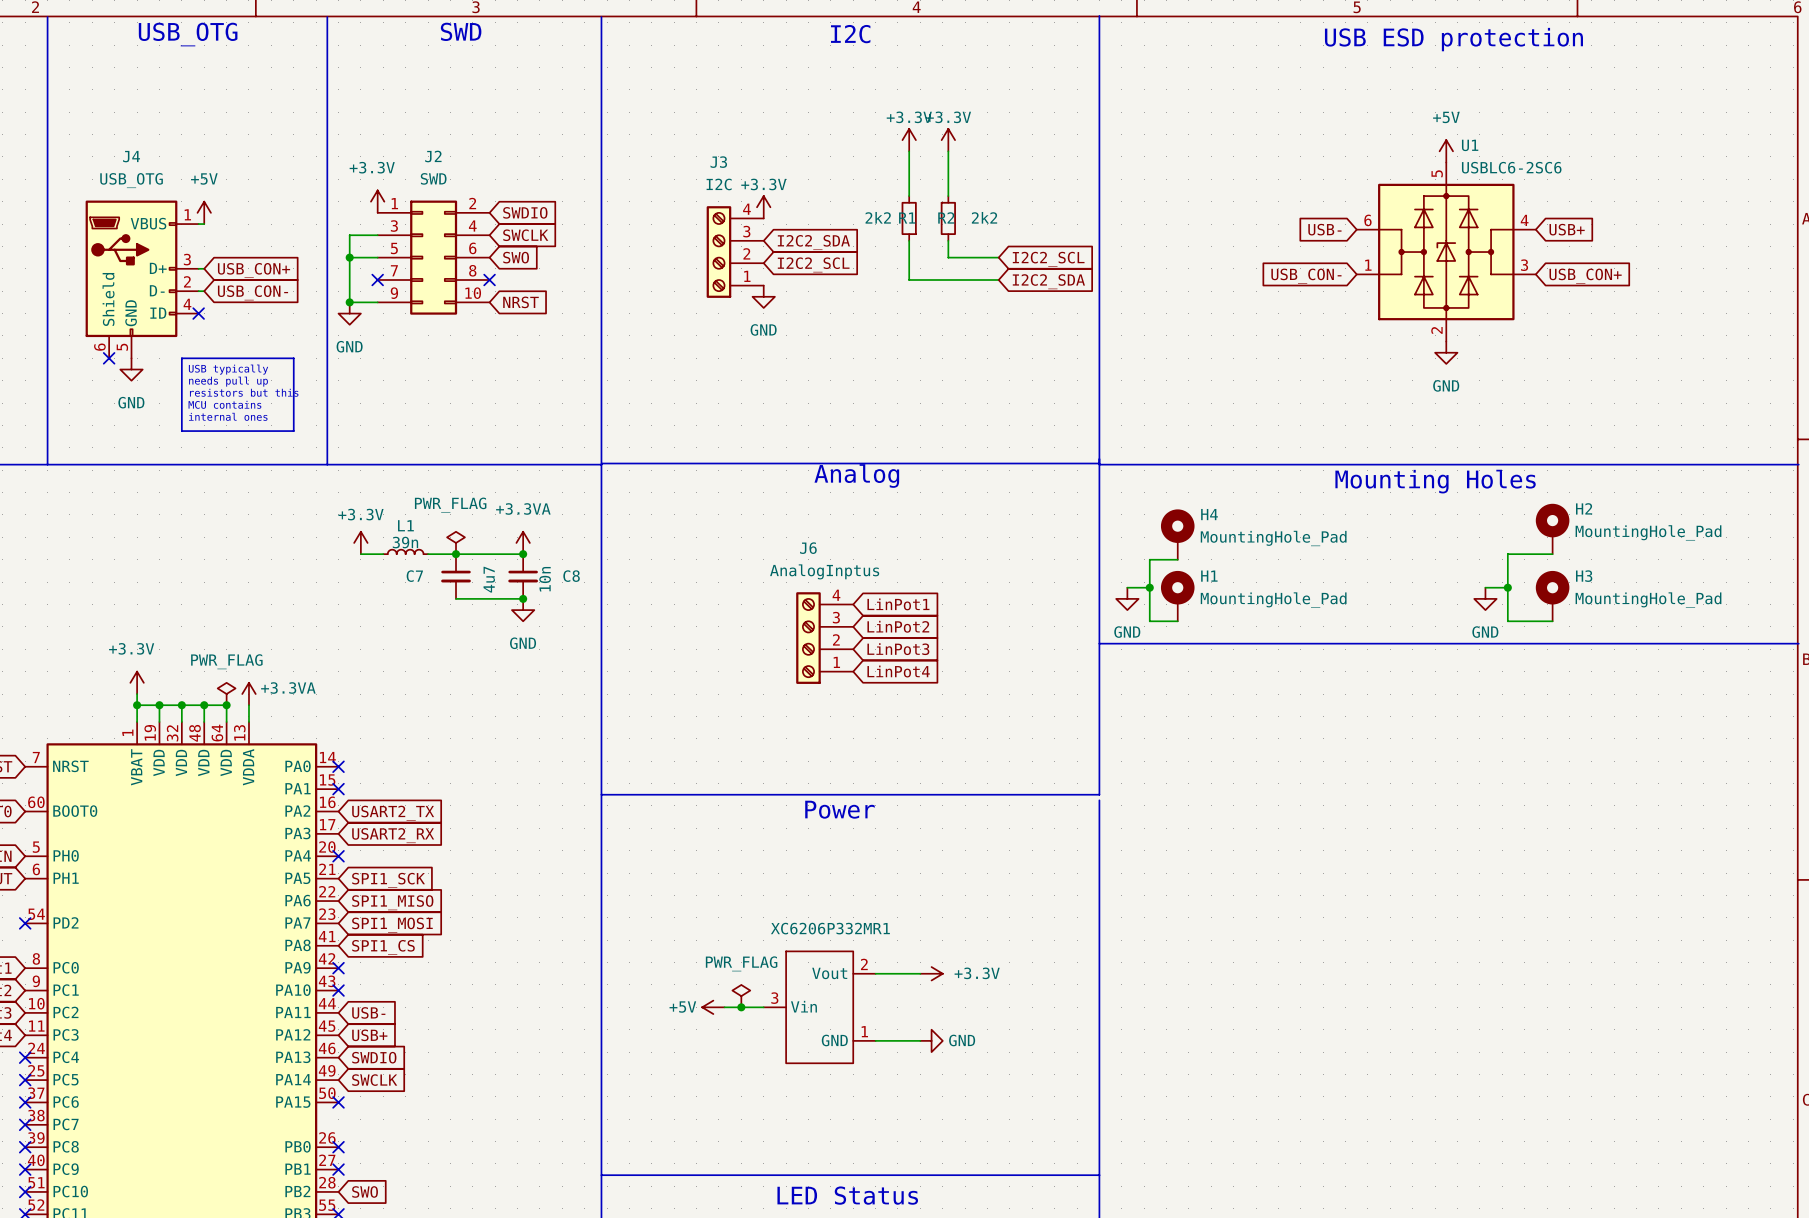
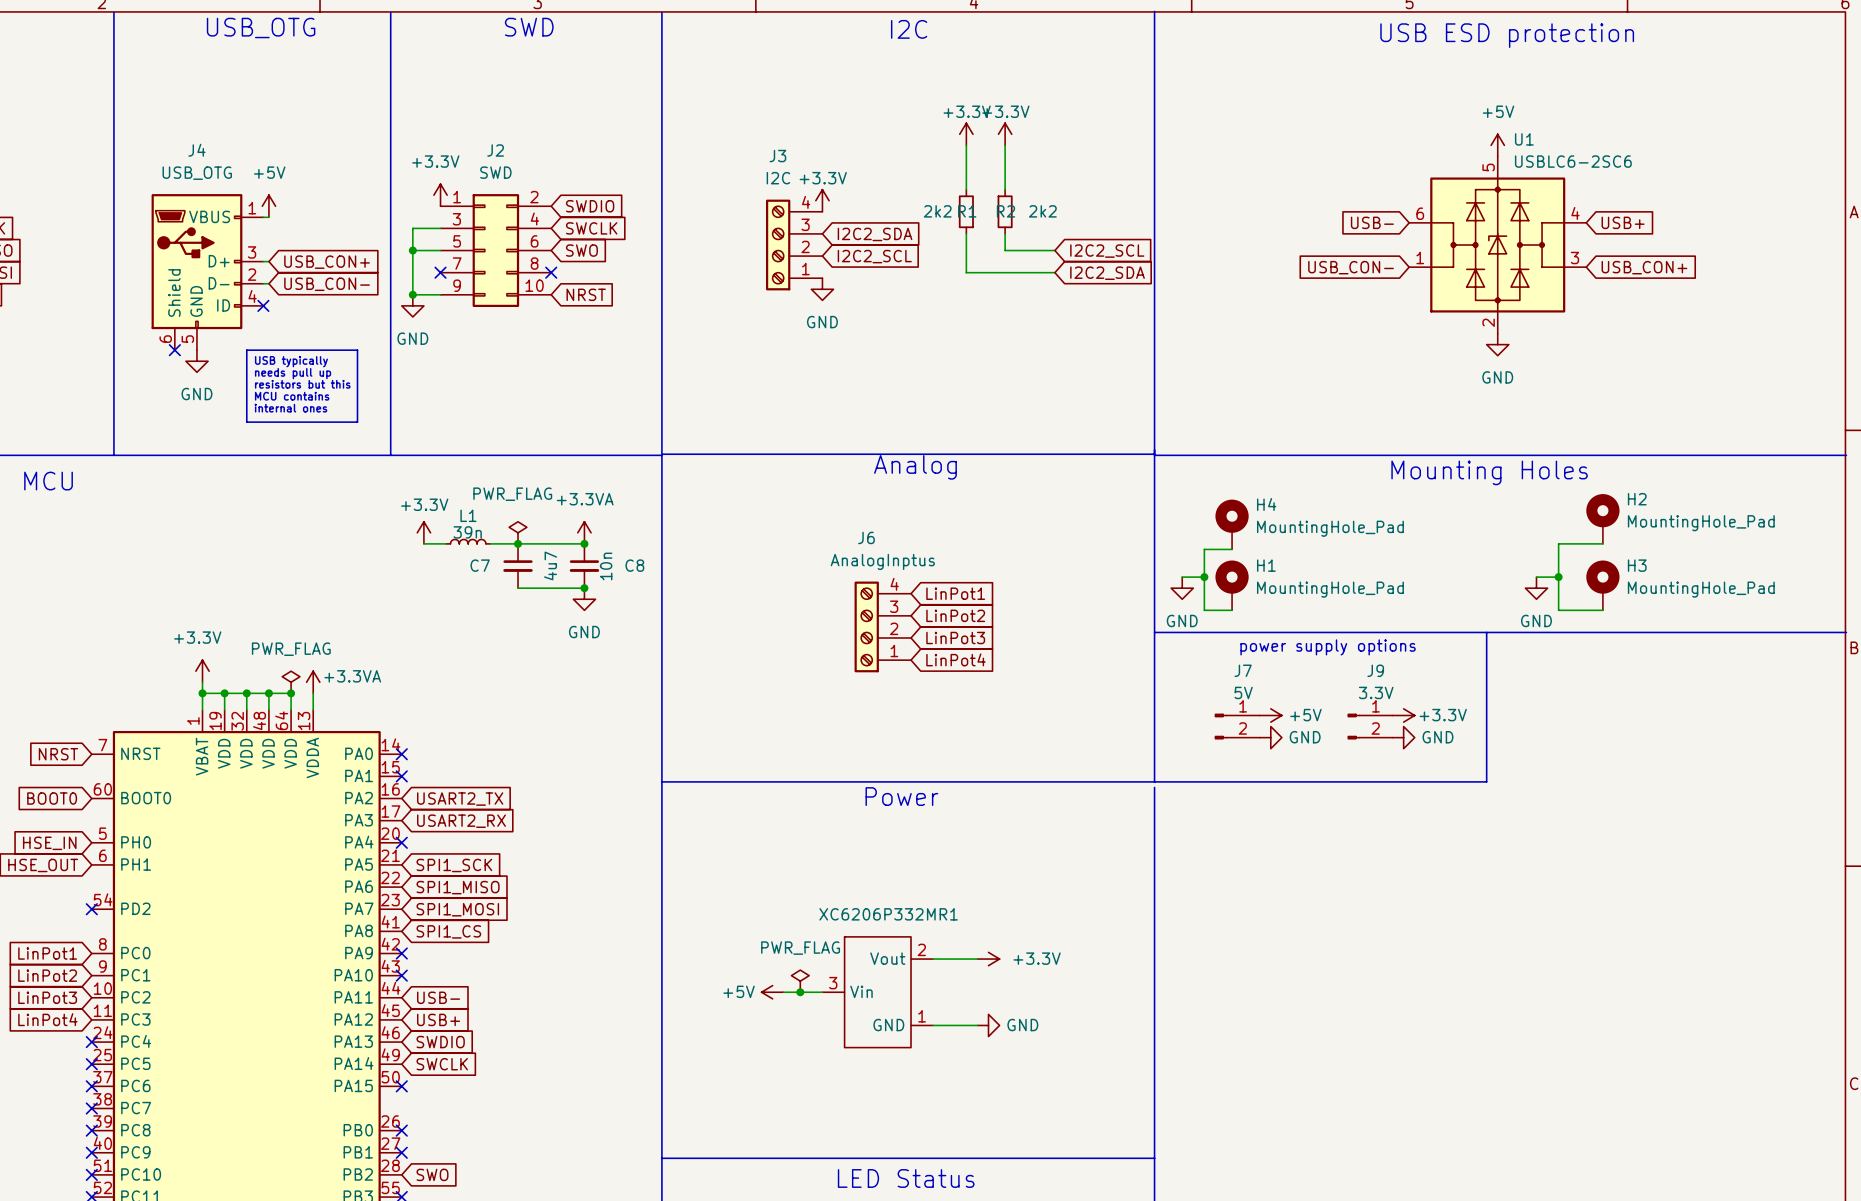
line: none -> (1486, 632) (1486, 781) (1154, 781)
text: none -> power supply options (1328, 647)
power symbol: none -> +5V (1270, 715)
power symbol: none -> +3.3V (1403, 715)
J7: none -> 5V (1237, 726)
J9: none -> 3.3V (1370, 726)
power symbol: none -> GND (1270, 737)
power symbol: none -> GND (1403, 737)

